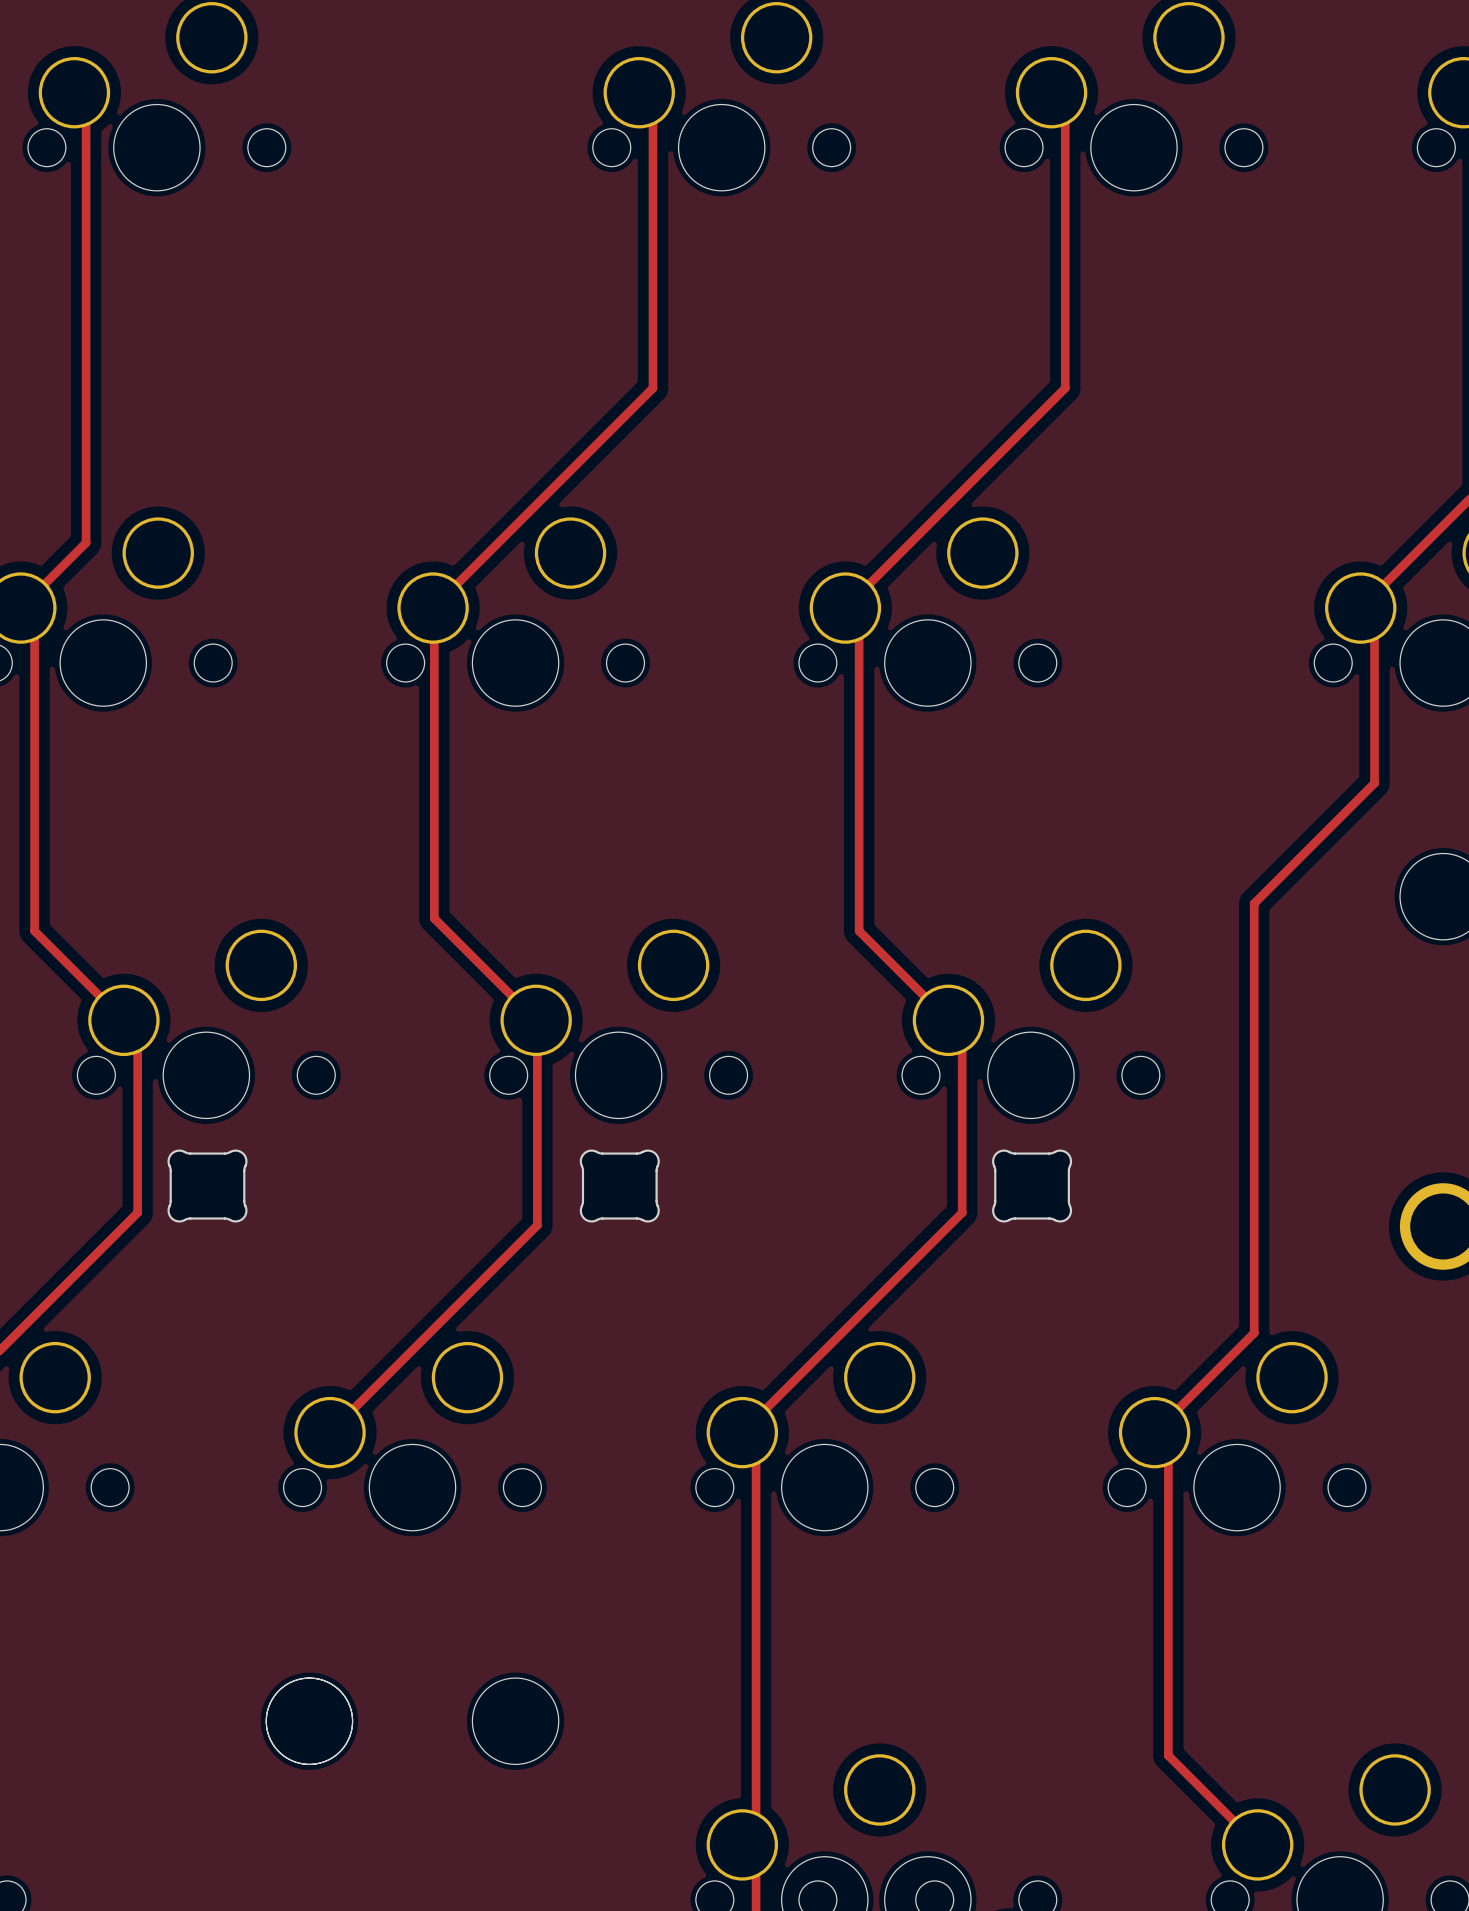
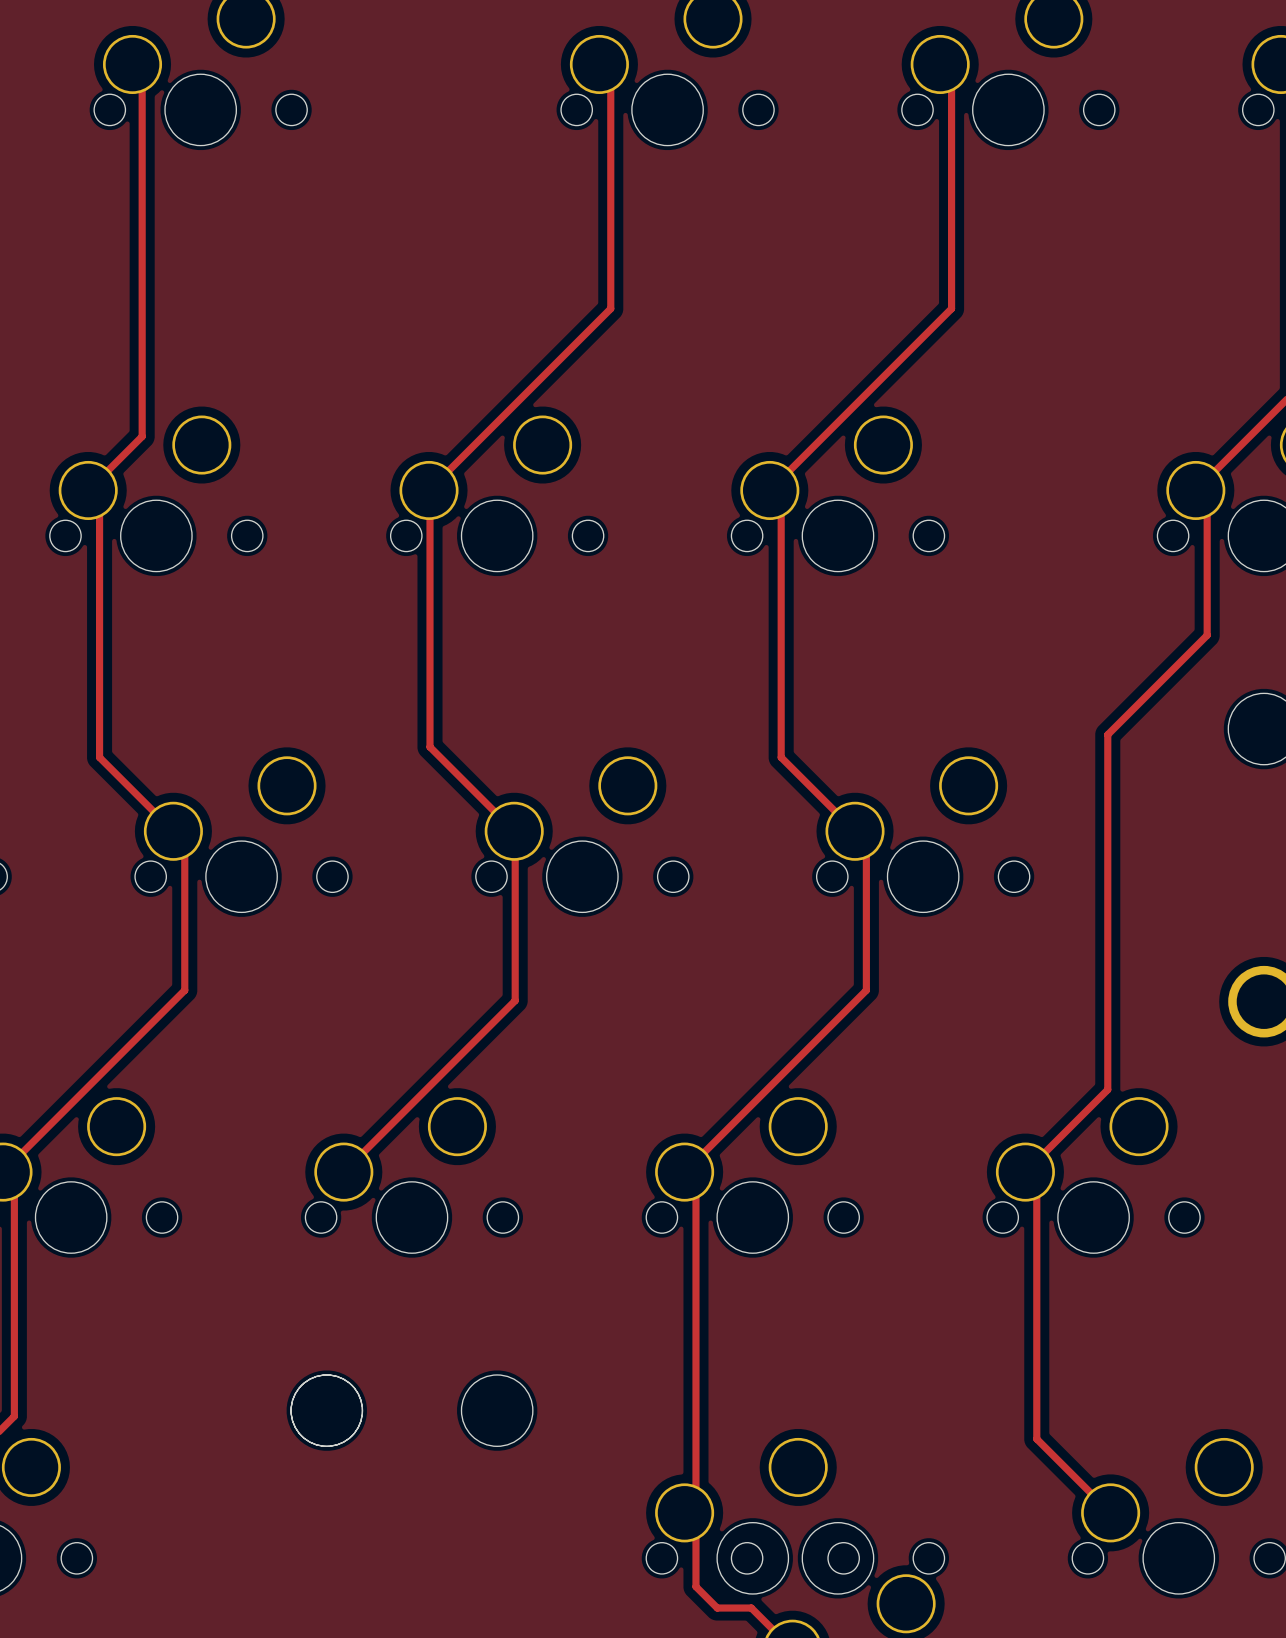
part: (207, 1186) -> none
part: (619, 1186) -> none
part: (1032, 1186) -> none

